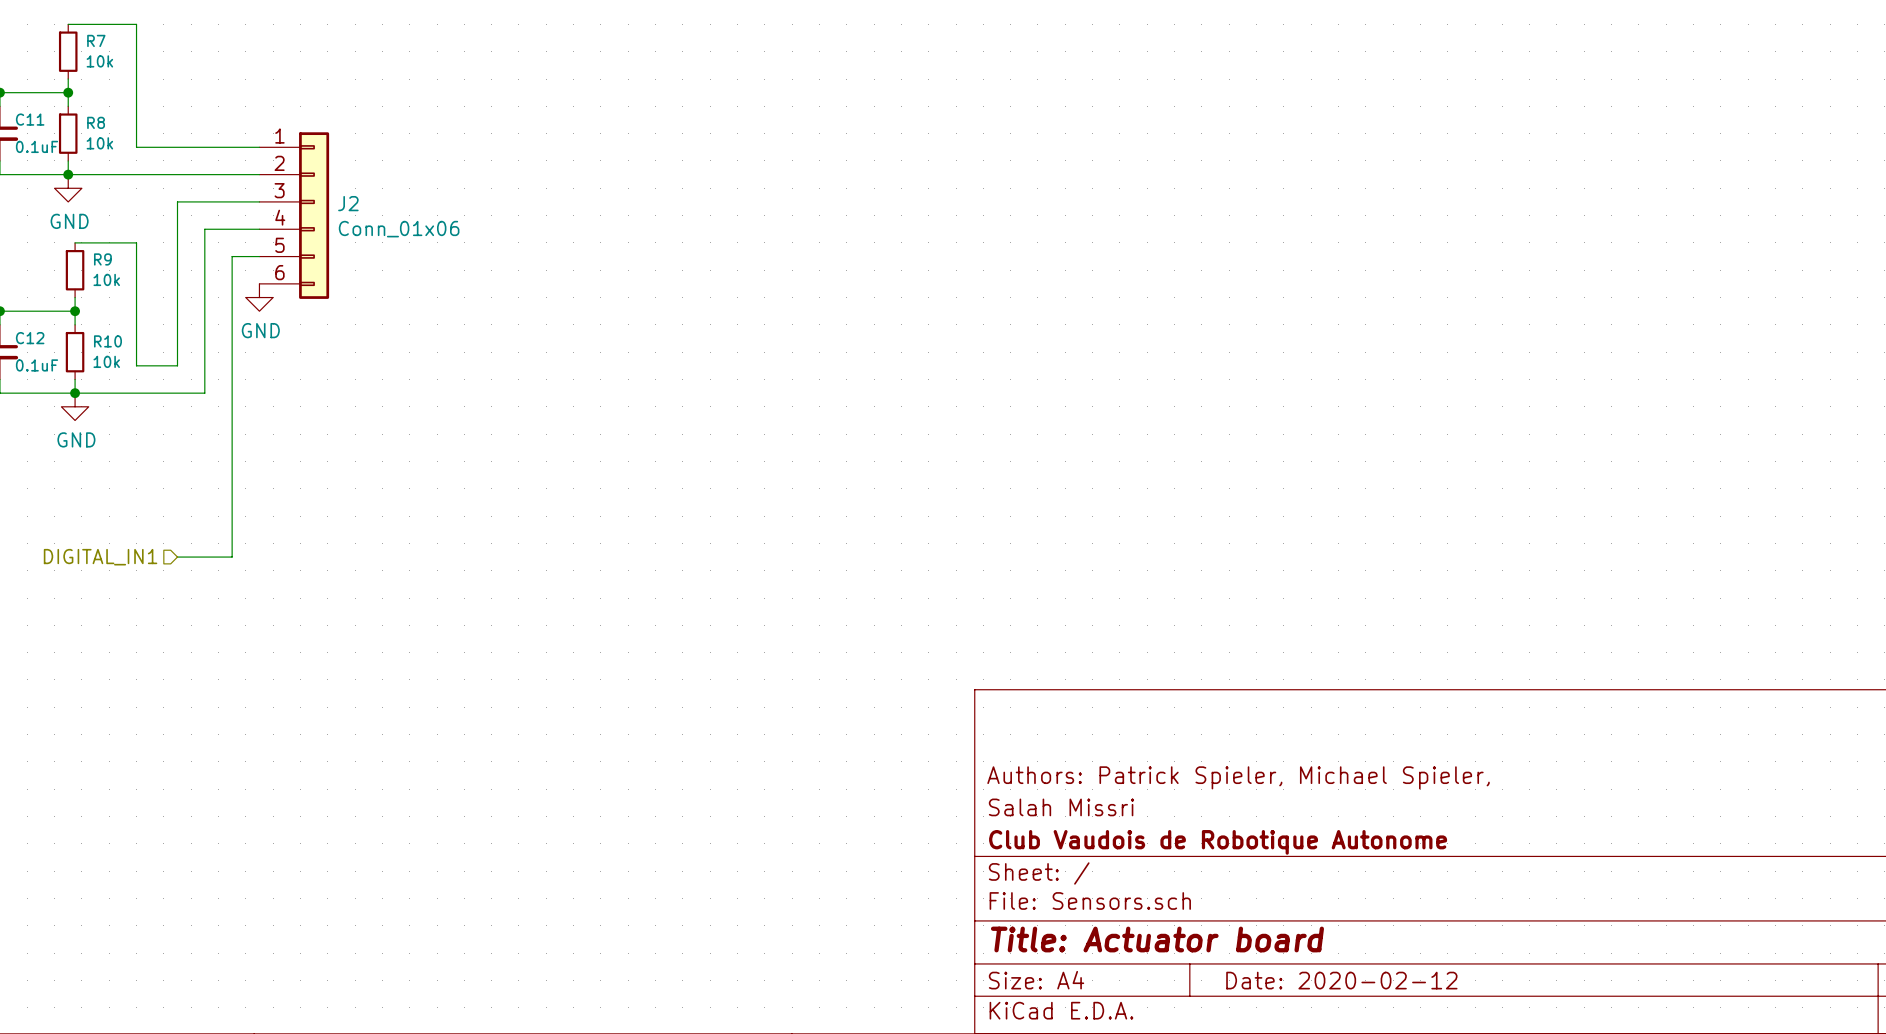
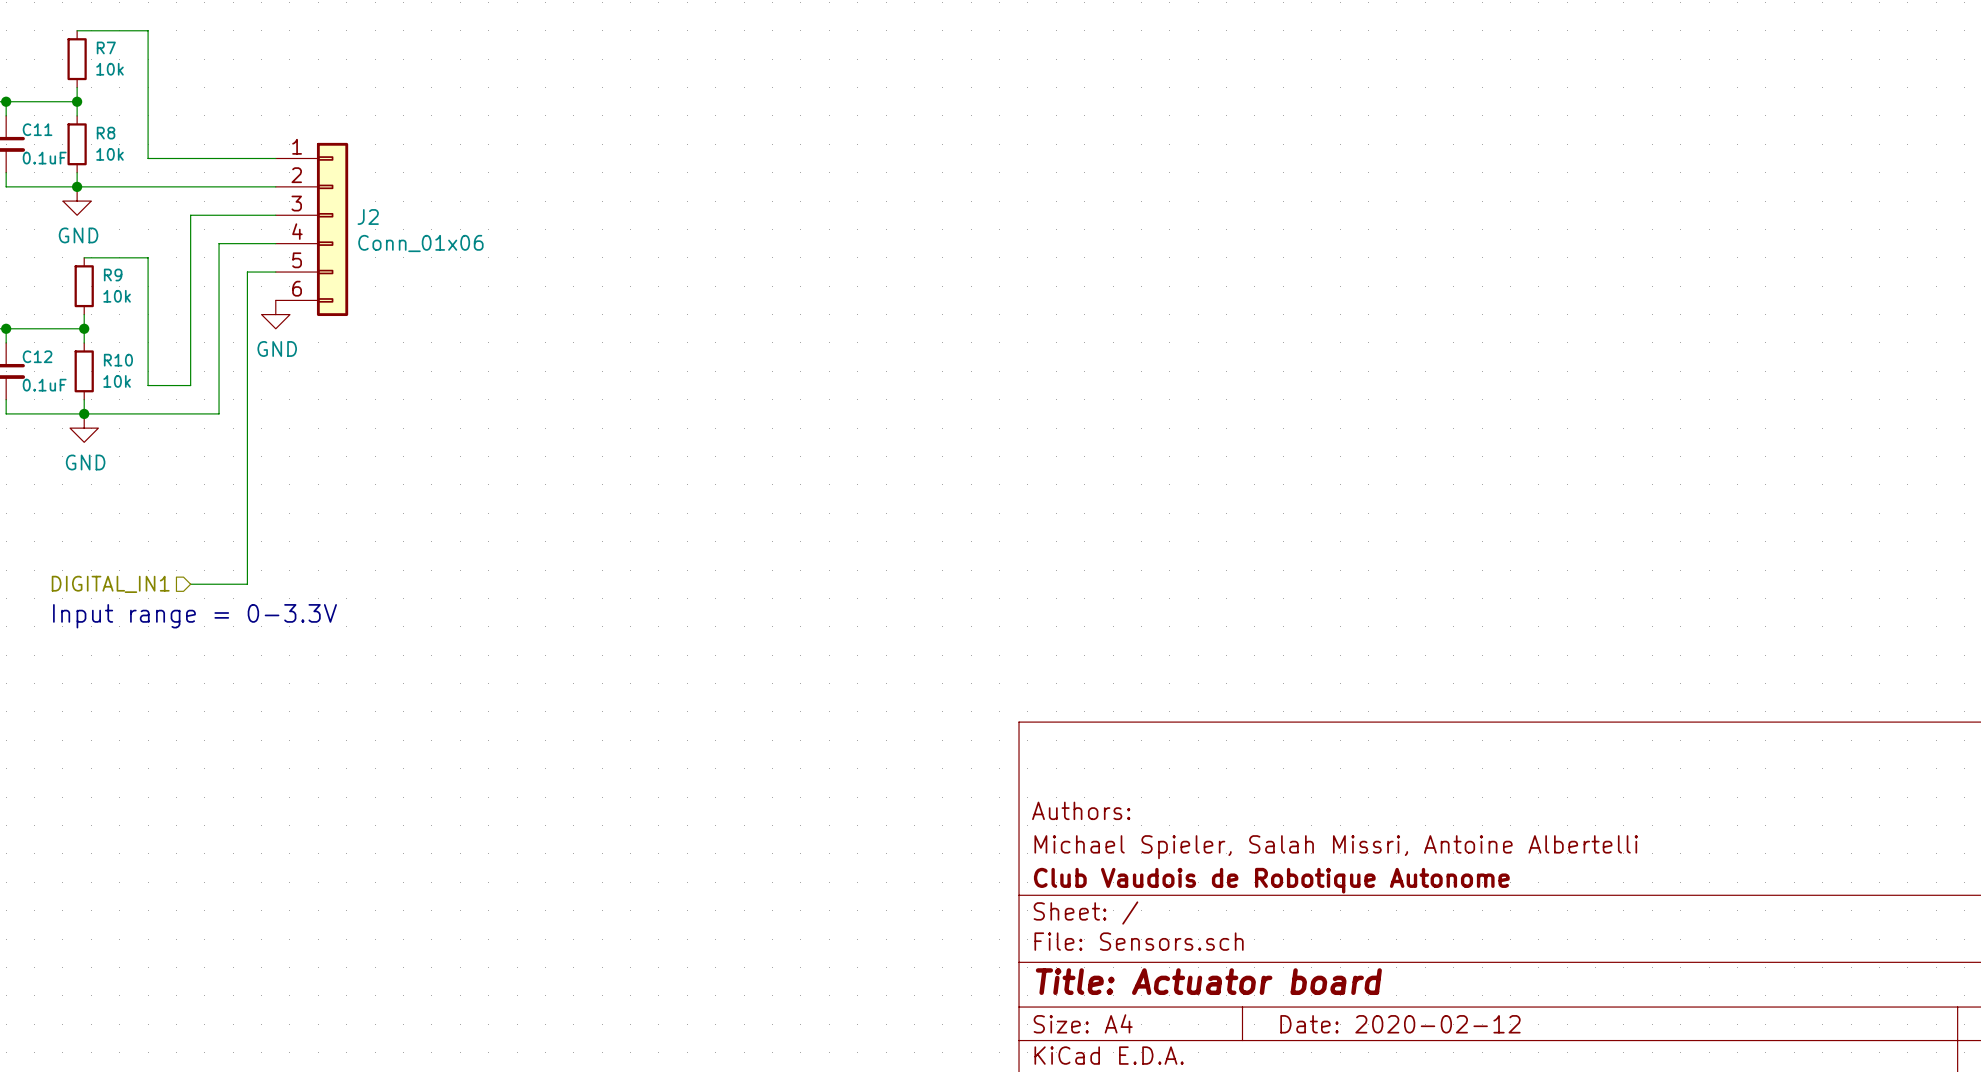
text: none -> Input range = 0-3.3V (195, 616)
title block: Authors: Patrick Spieler, Michael Spieler, (1238, 777) -> Authors: (1081, 810)
title block: Salah Missri (1061, 807) -> Michael Spieler, Salah Missri, Antoine Albertelli (1336, 847)

